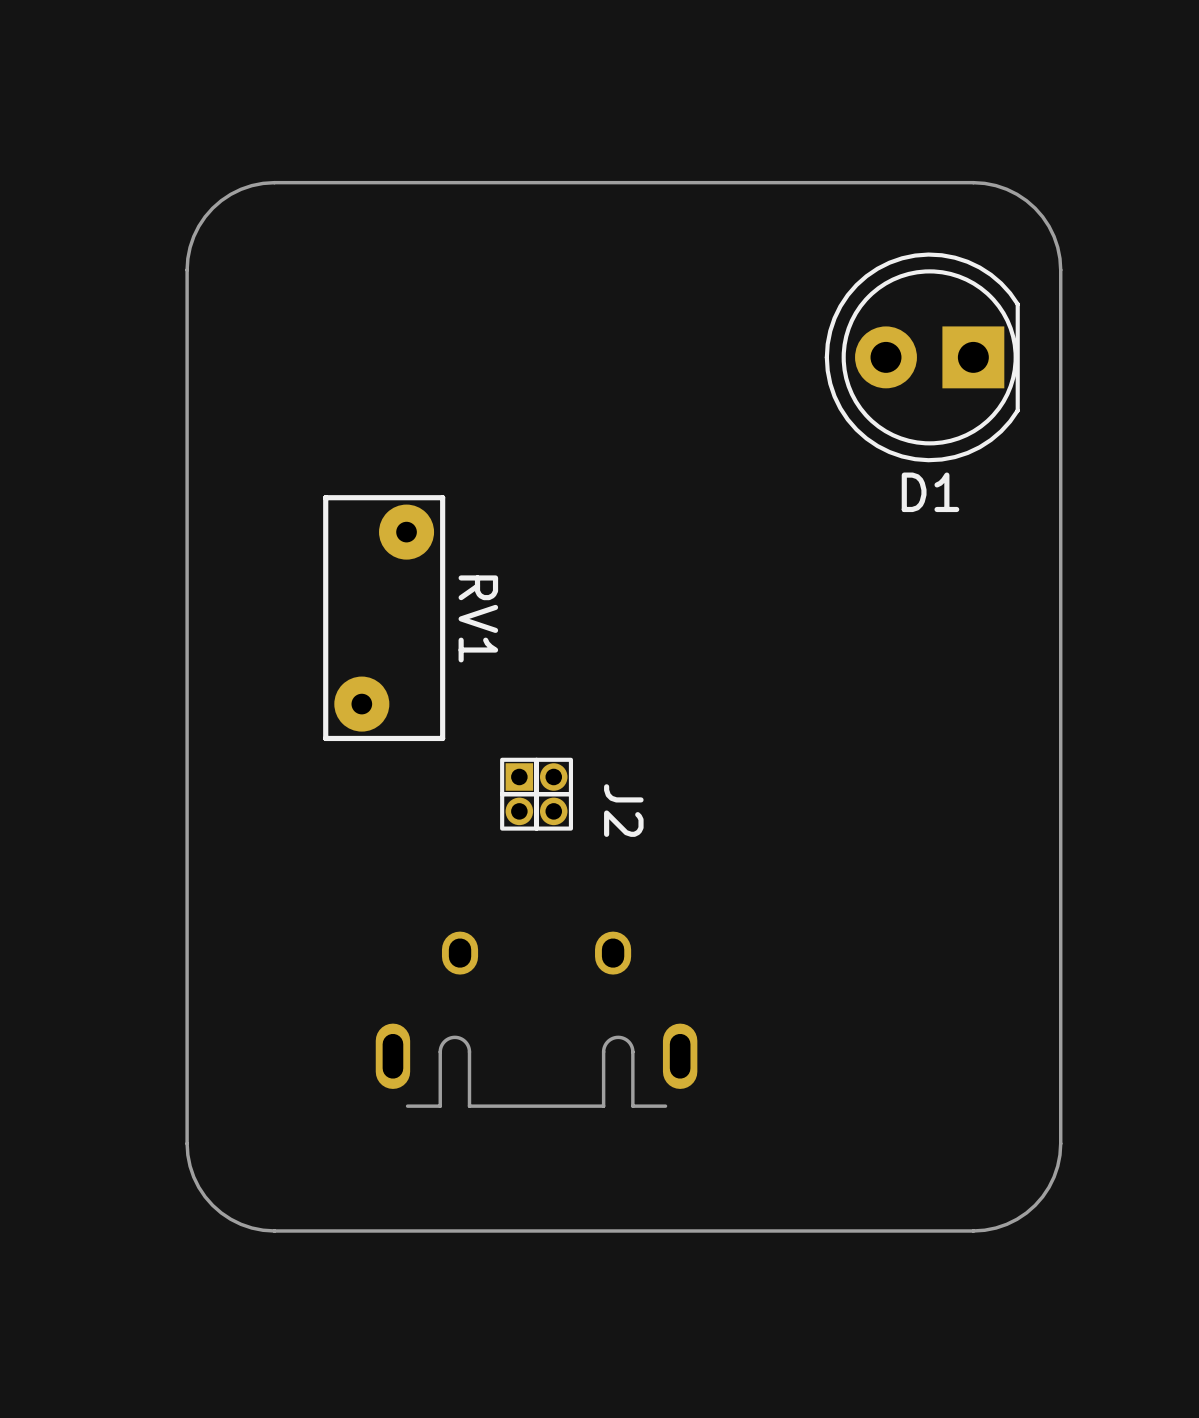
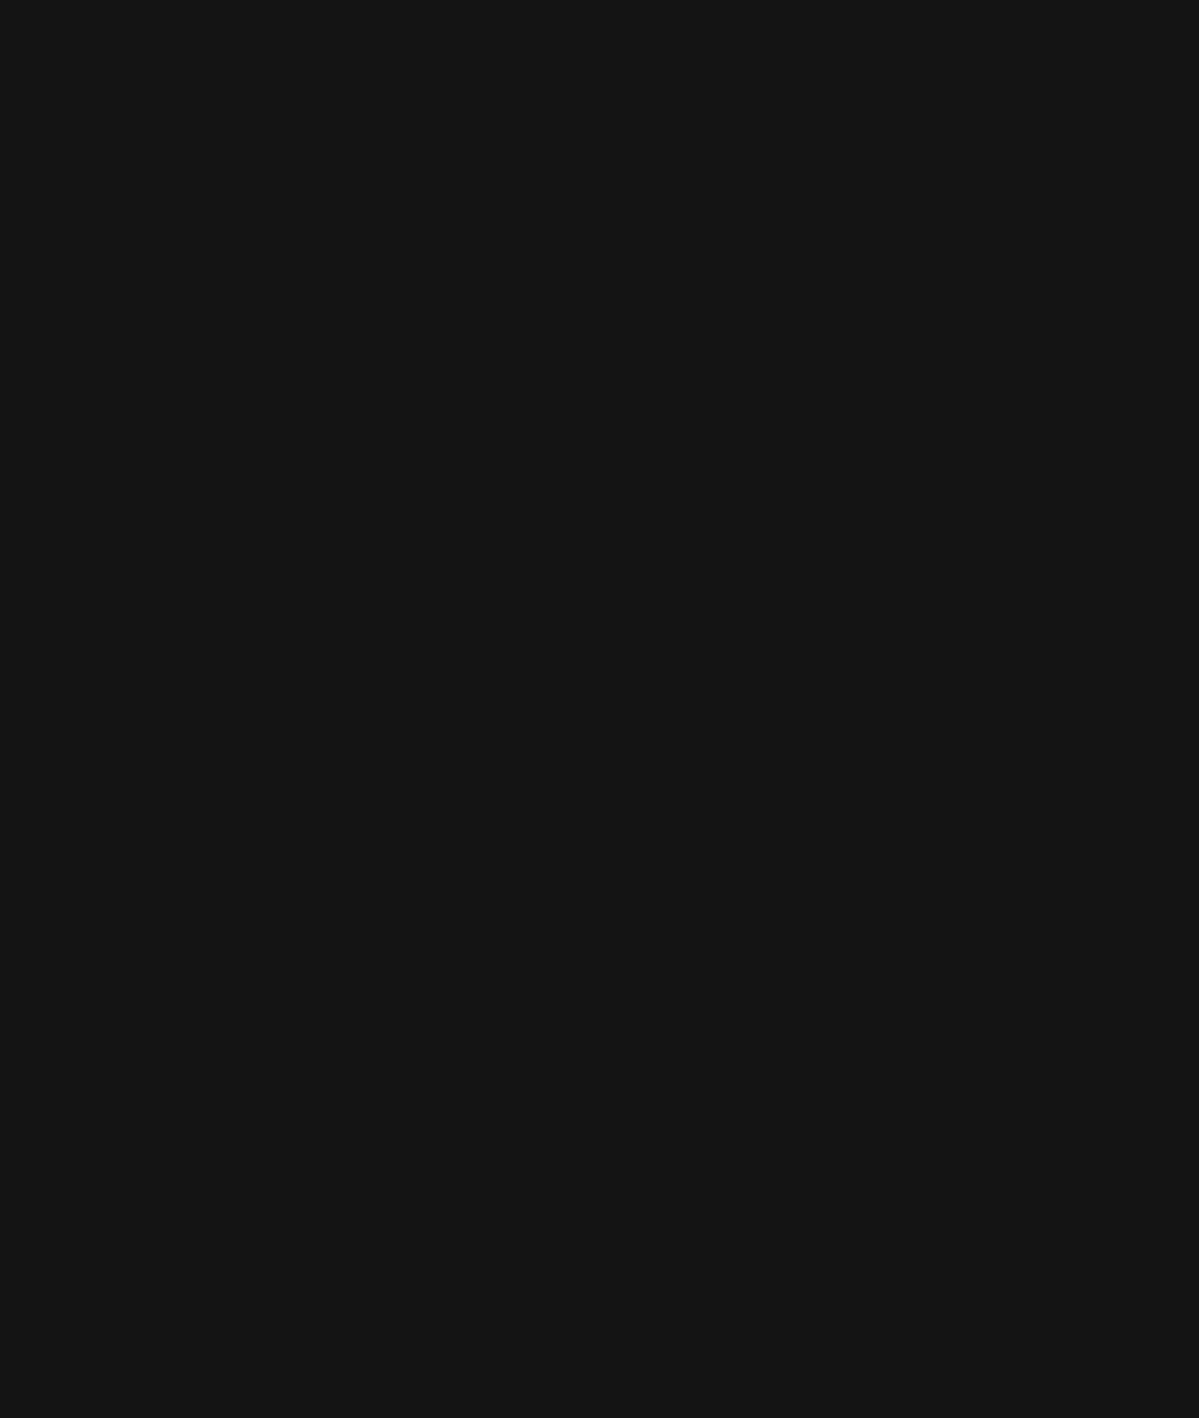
board edge: (973, 182) (274, 182) (251, 185) (230, 194) (205, 216) (193, 236) (187, 270) (187, 1143) (193, 1177) (205, 1196) (221, 1212) (241, 1224) (274, 1230) (973, 1230) (1006, 1224) (1026, 1212) (1042, 1196) (1054, 1177) (1060, 1143) (1059, 258) (1054, 236) (1035, 208) (1006, 189) (973, 182) -> none
D1: (922, 357) -> none
RV1: (384, 618) -> none
J2: (536, 794) -> none
part: (536, 1019) -> none

